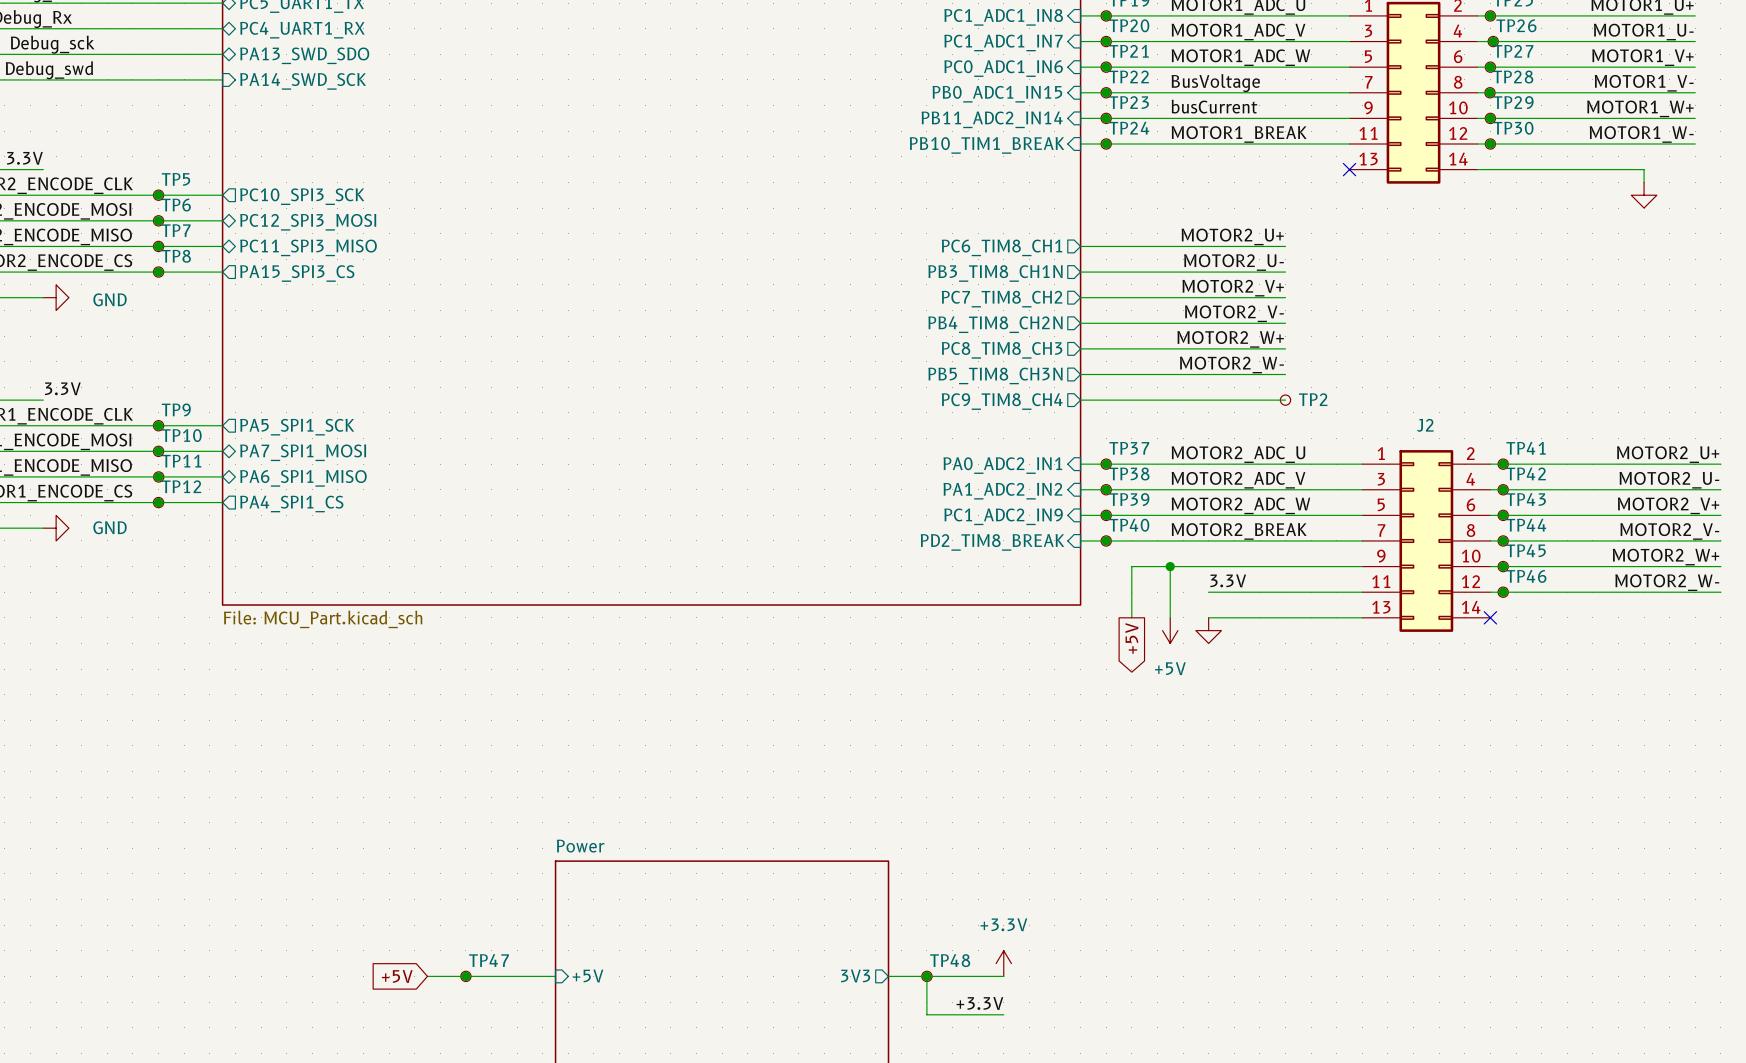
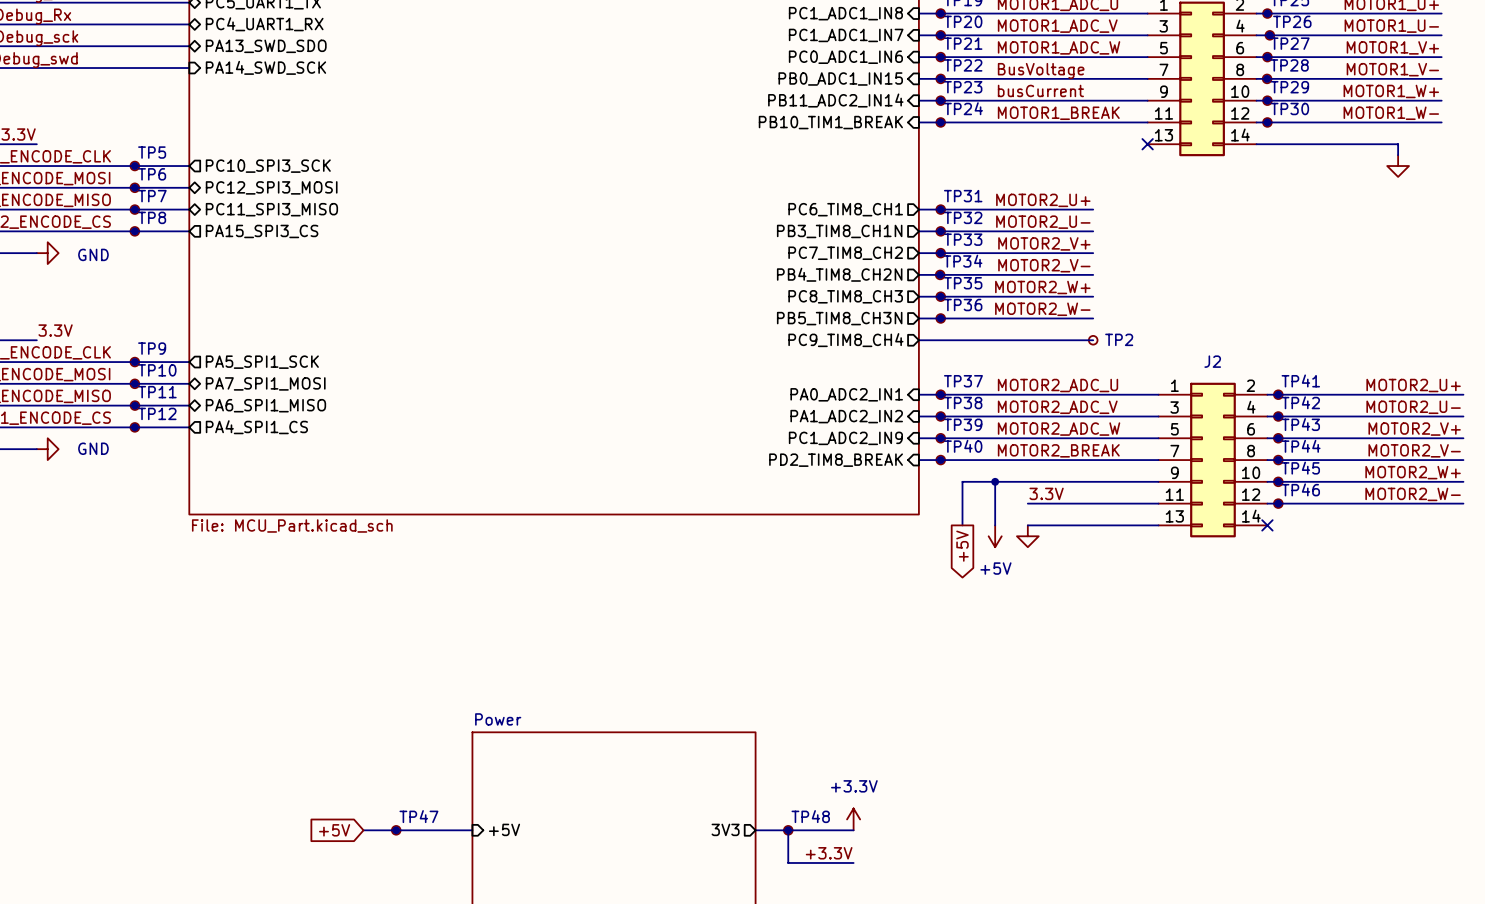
junction: none -> (940, 209)
TP31: none -> (940, 209)
junction: none -> (940, 231)
TP32: none -> (940, 231)
junction: none -> (940, 253)
TP33: none -> (940, 253)
junction: none -> (940, 274)
TP34: none -> (940, 274)
junction: none -> (940, 296)
TP35: none -> (940, 296)
junction: none -> (940, 318)
TP36: none -> (940, 318)

